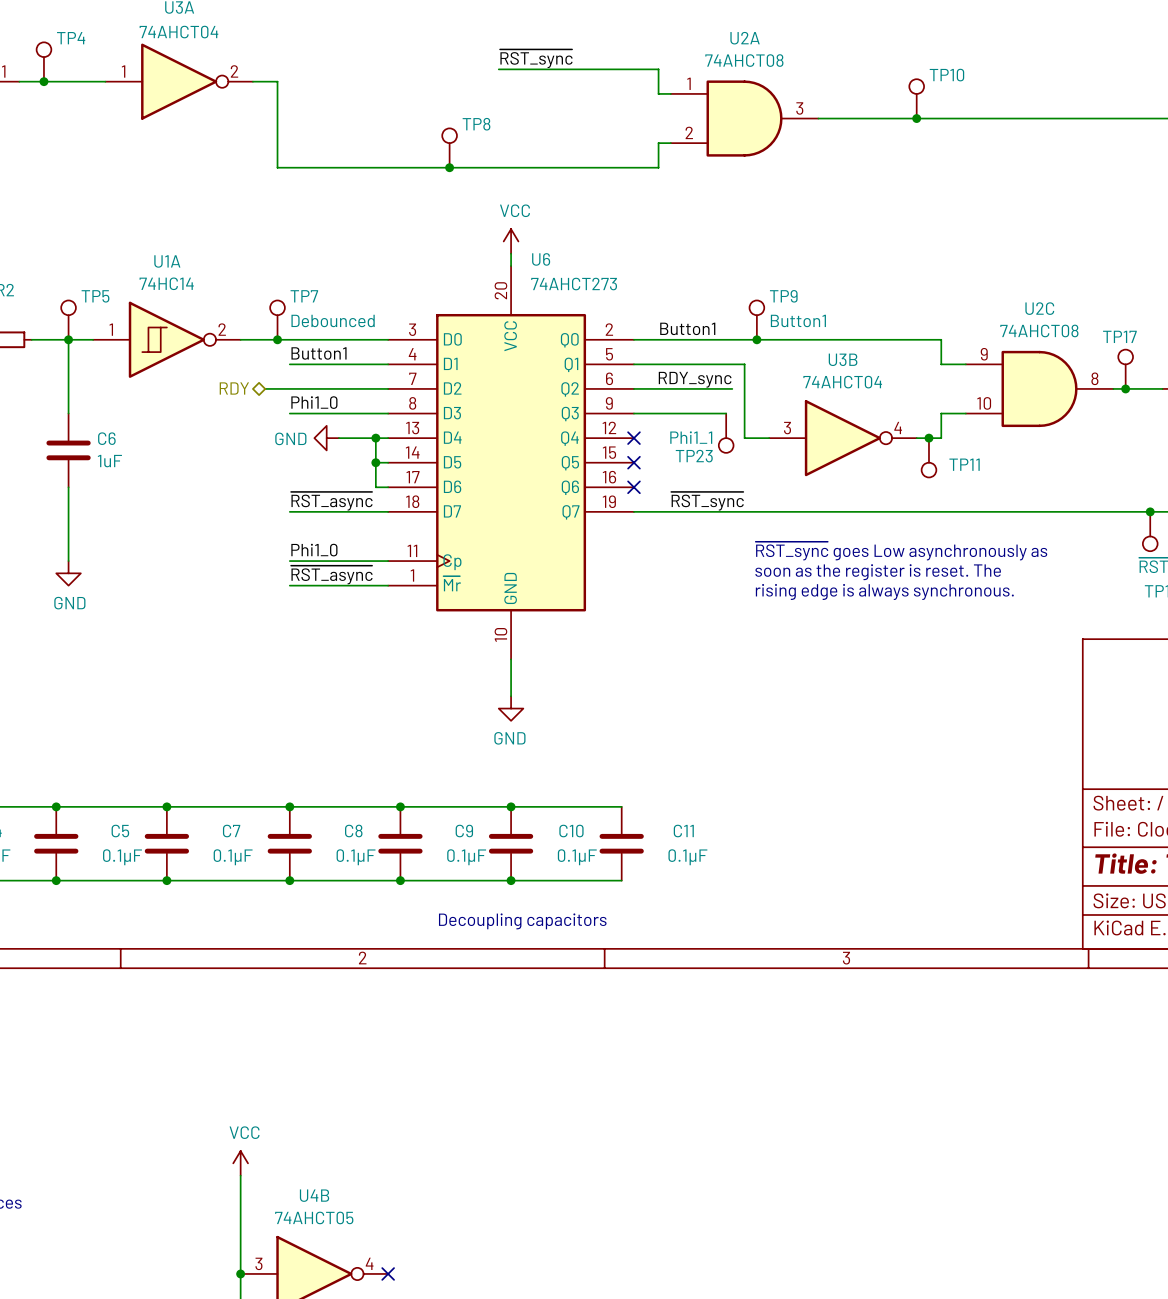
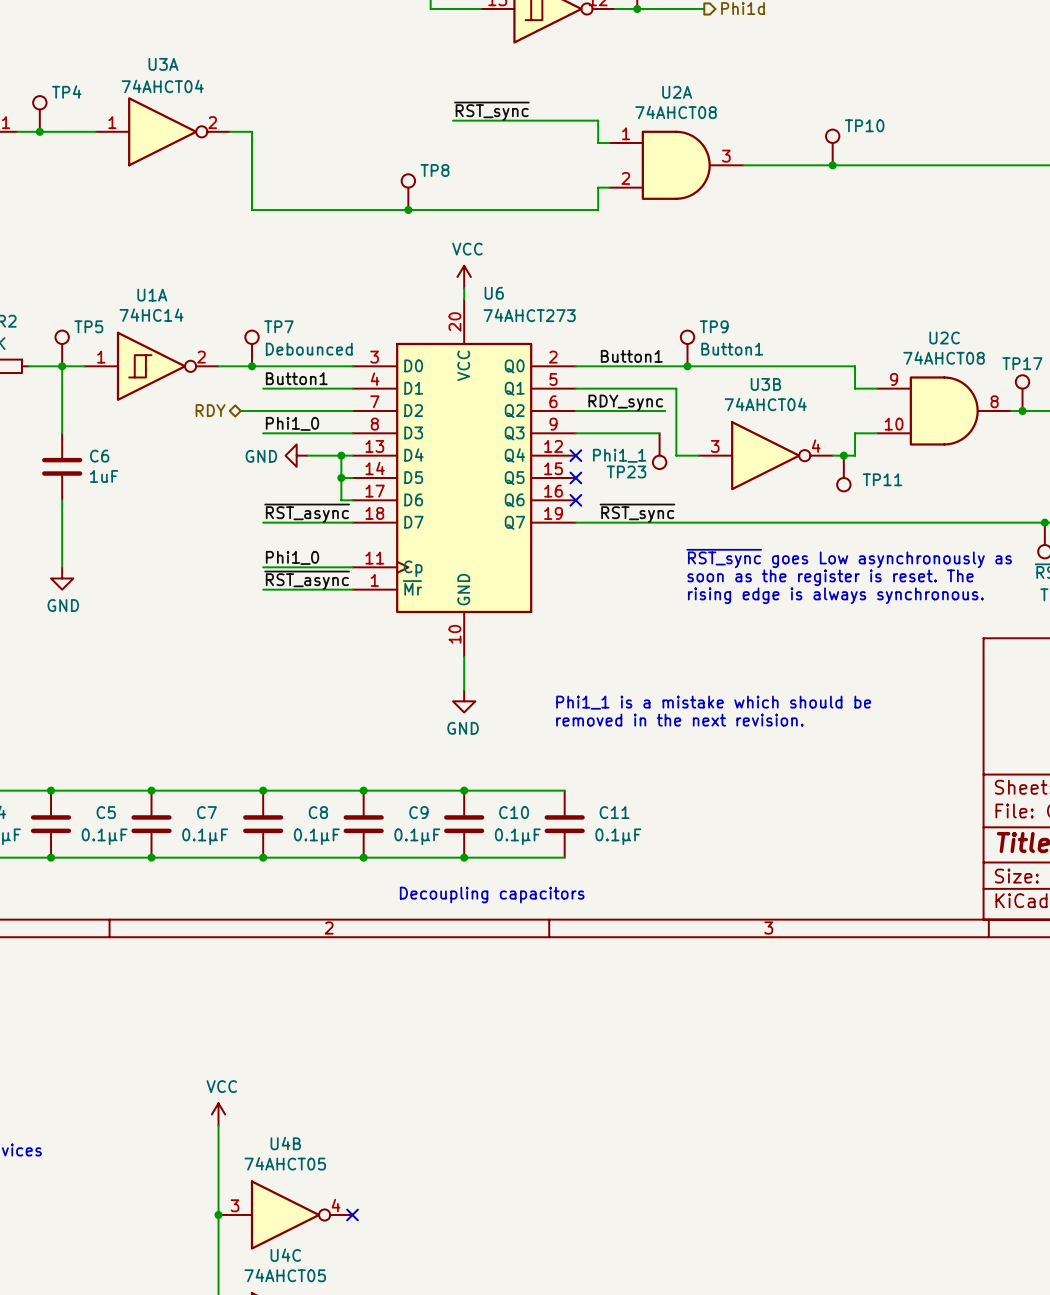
text: none -> Phi1_1 is a mistake which should be (713, 702)
text: none -> removed in the next revision. (679, 720)

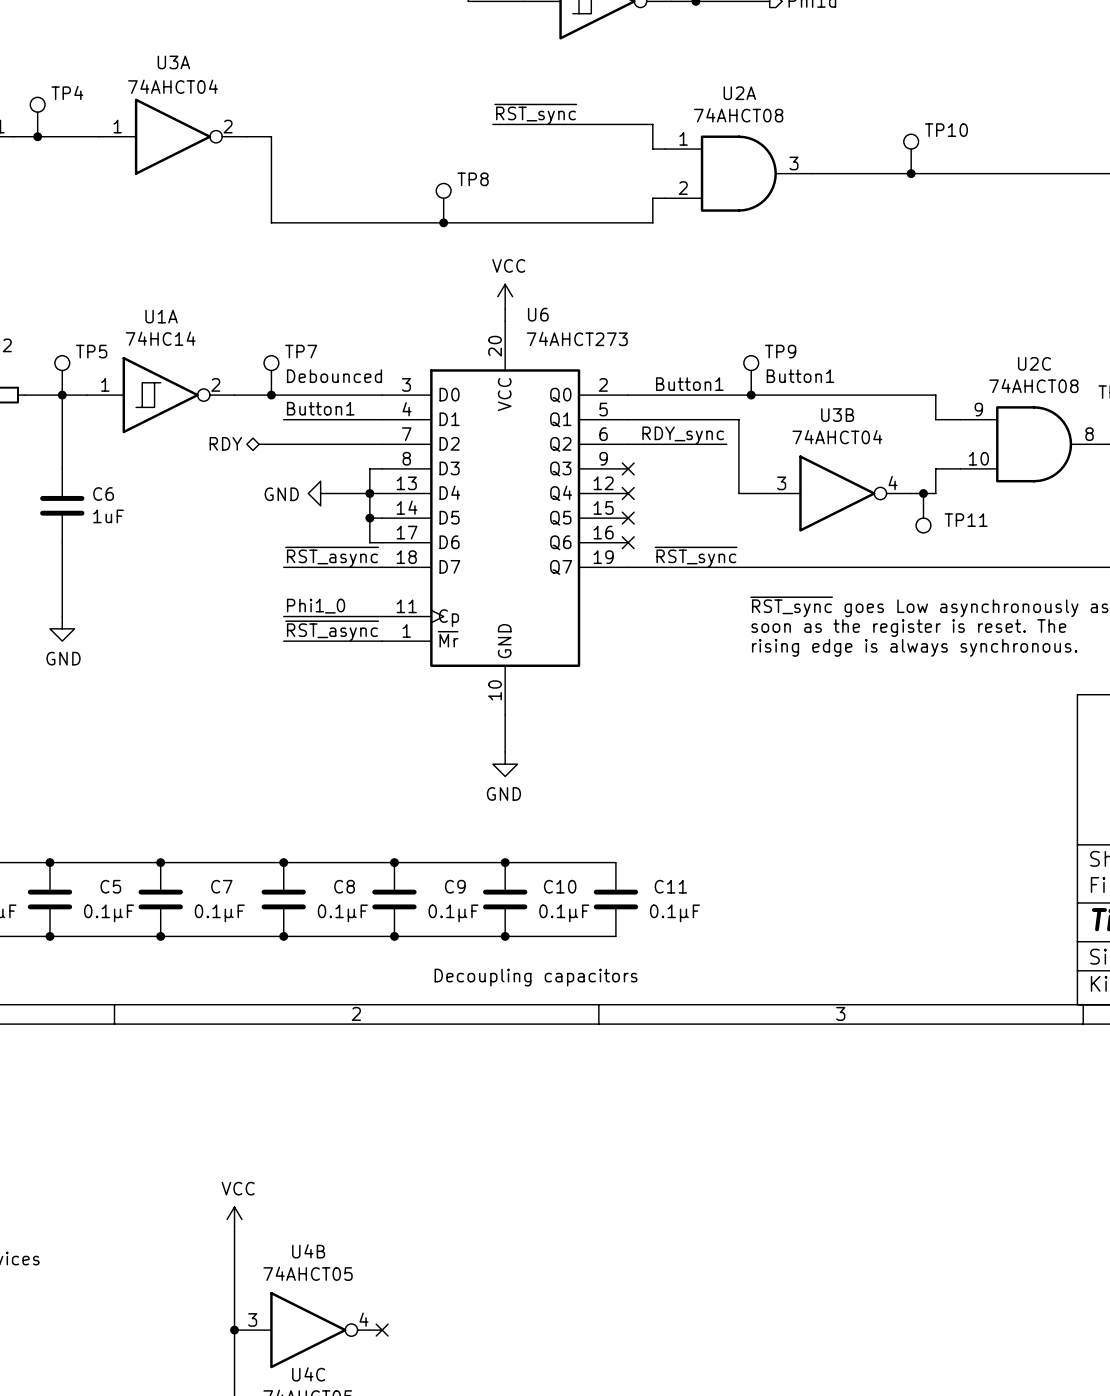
label: Phi1_0 (292, 423) -> none
wire: (263, 433) (341, 433) -> (369, 493) (369, 468)
wire: (575, 433) (659, 433) -> none
no-connect mark: none -> (628, 468)
TP23: Phi1_1 (659, 451) -> none
text: Phi1_1 is a mistake which should be (713, 702) -> none
text: removed in the next revision. (679, 720) -> none

